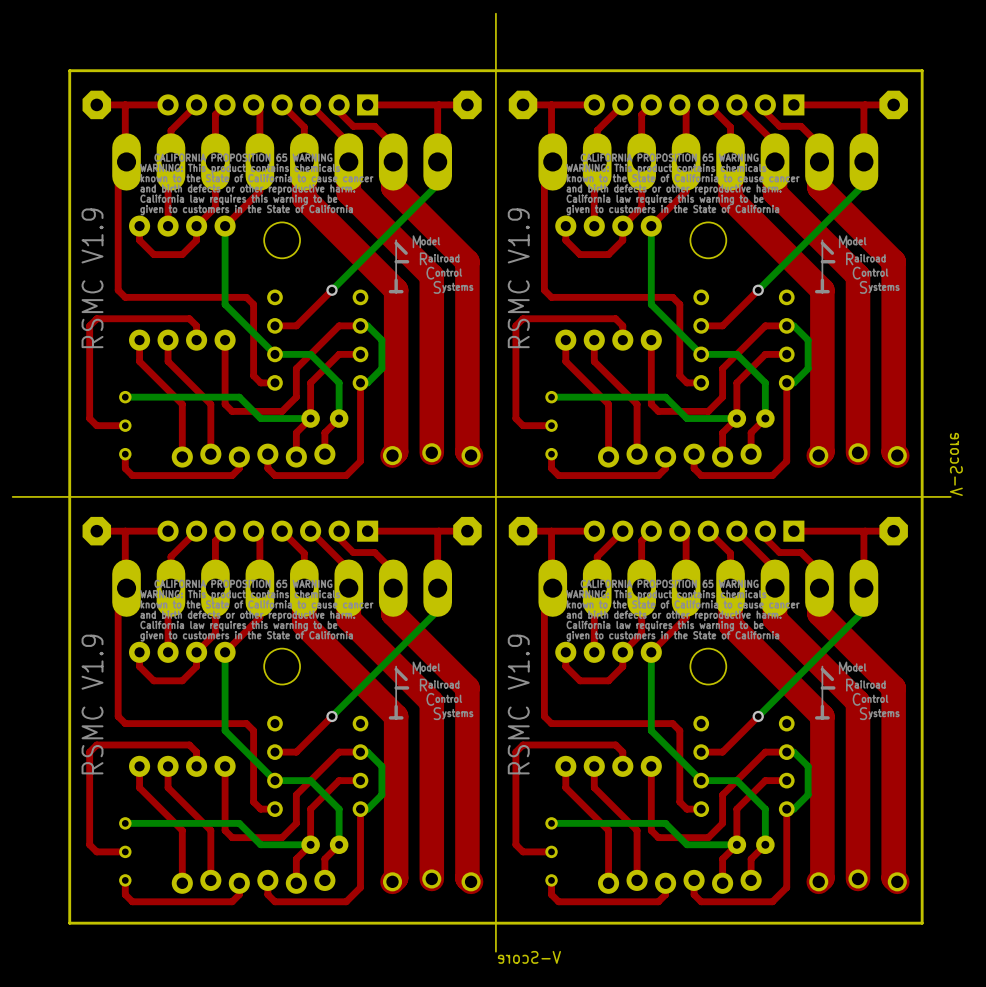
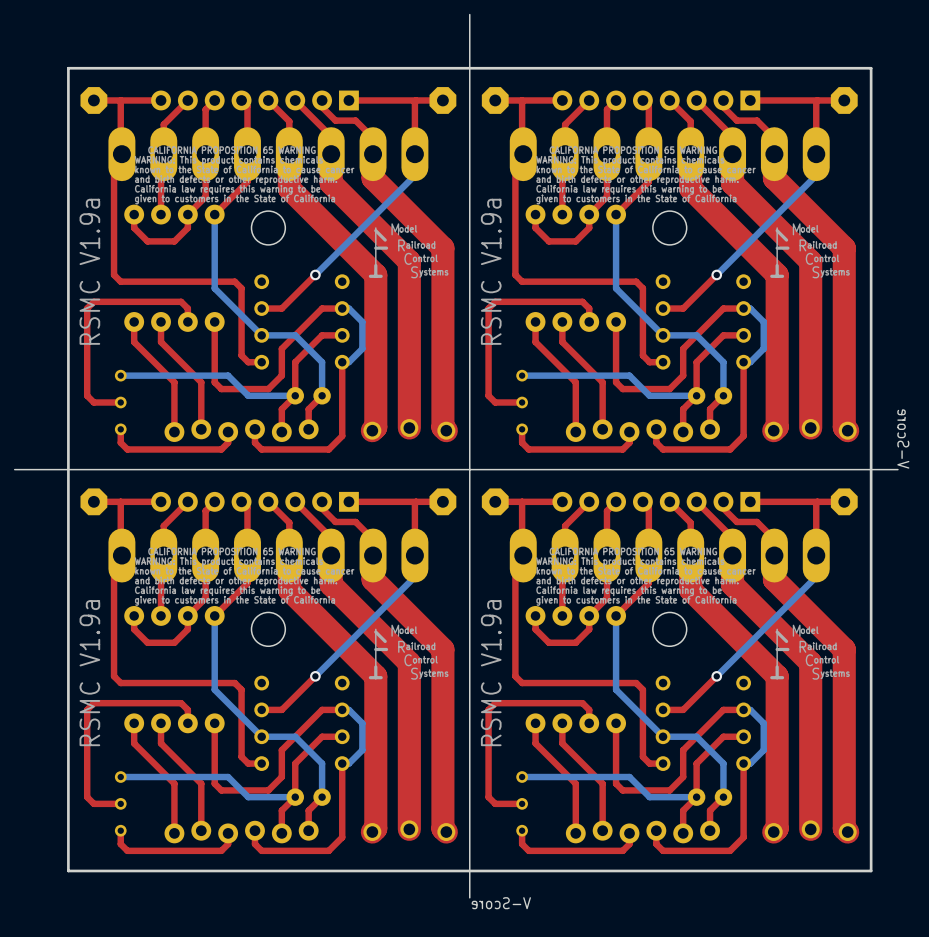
text: RSMC V1.9 (92, 278) -> RSMC V1.9a (89, 271)
text: RSMC V1.9 (518, 278) -> RSMC V1.9a (491, 271)
text: RSMC V1.9 (92, 704) -> RSMC V1.9a (89, 673)
text: RSMC V1.9 (518, 704) -> RSMC V1.9a (491, 673)

